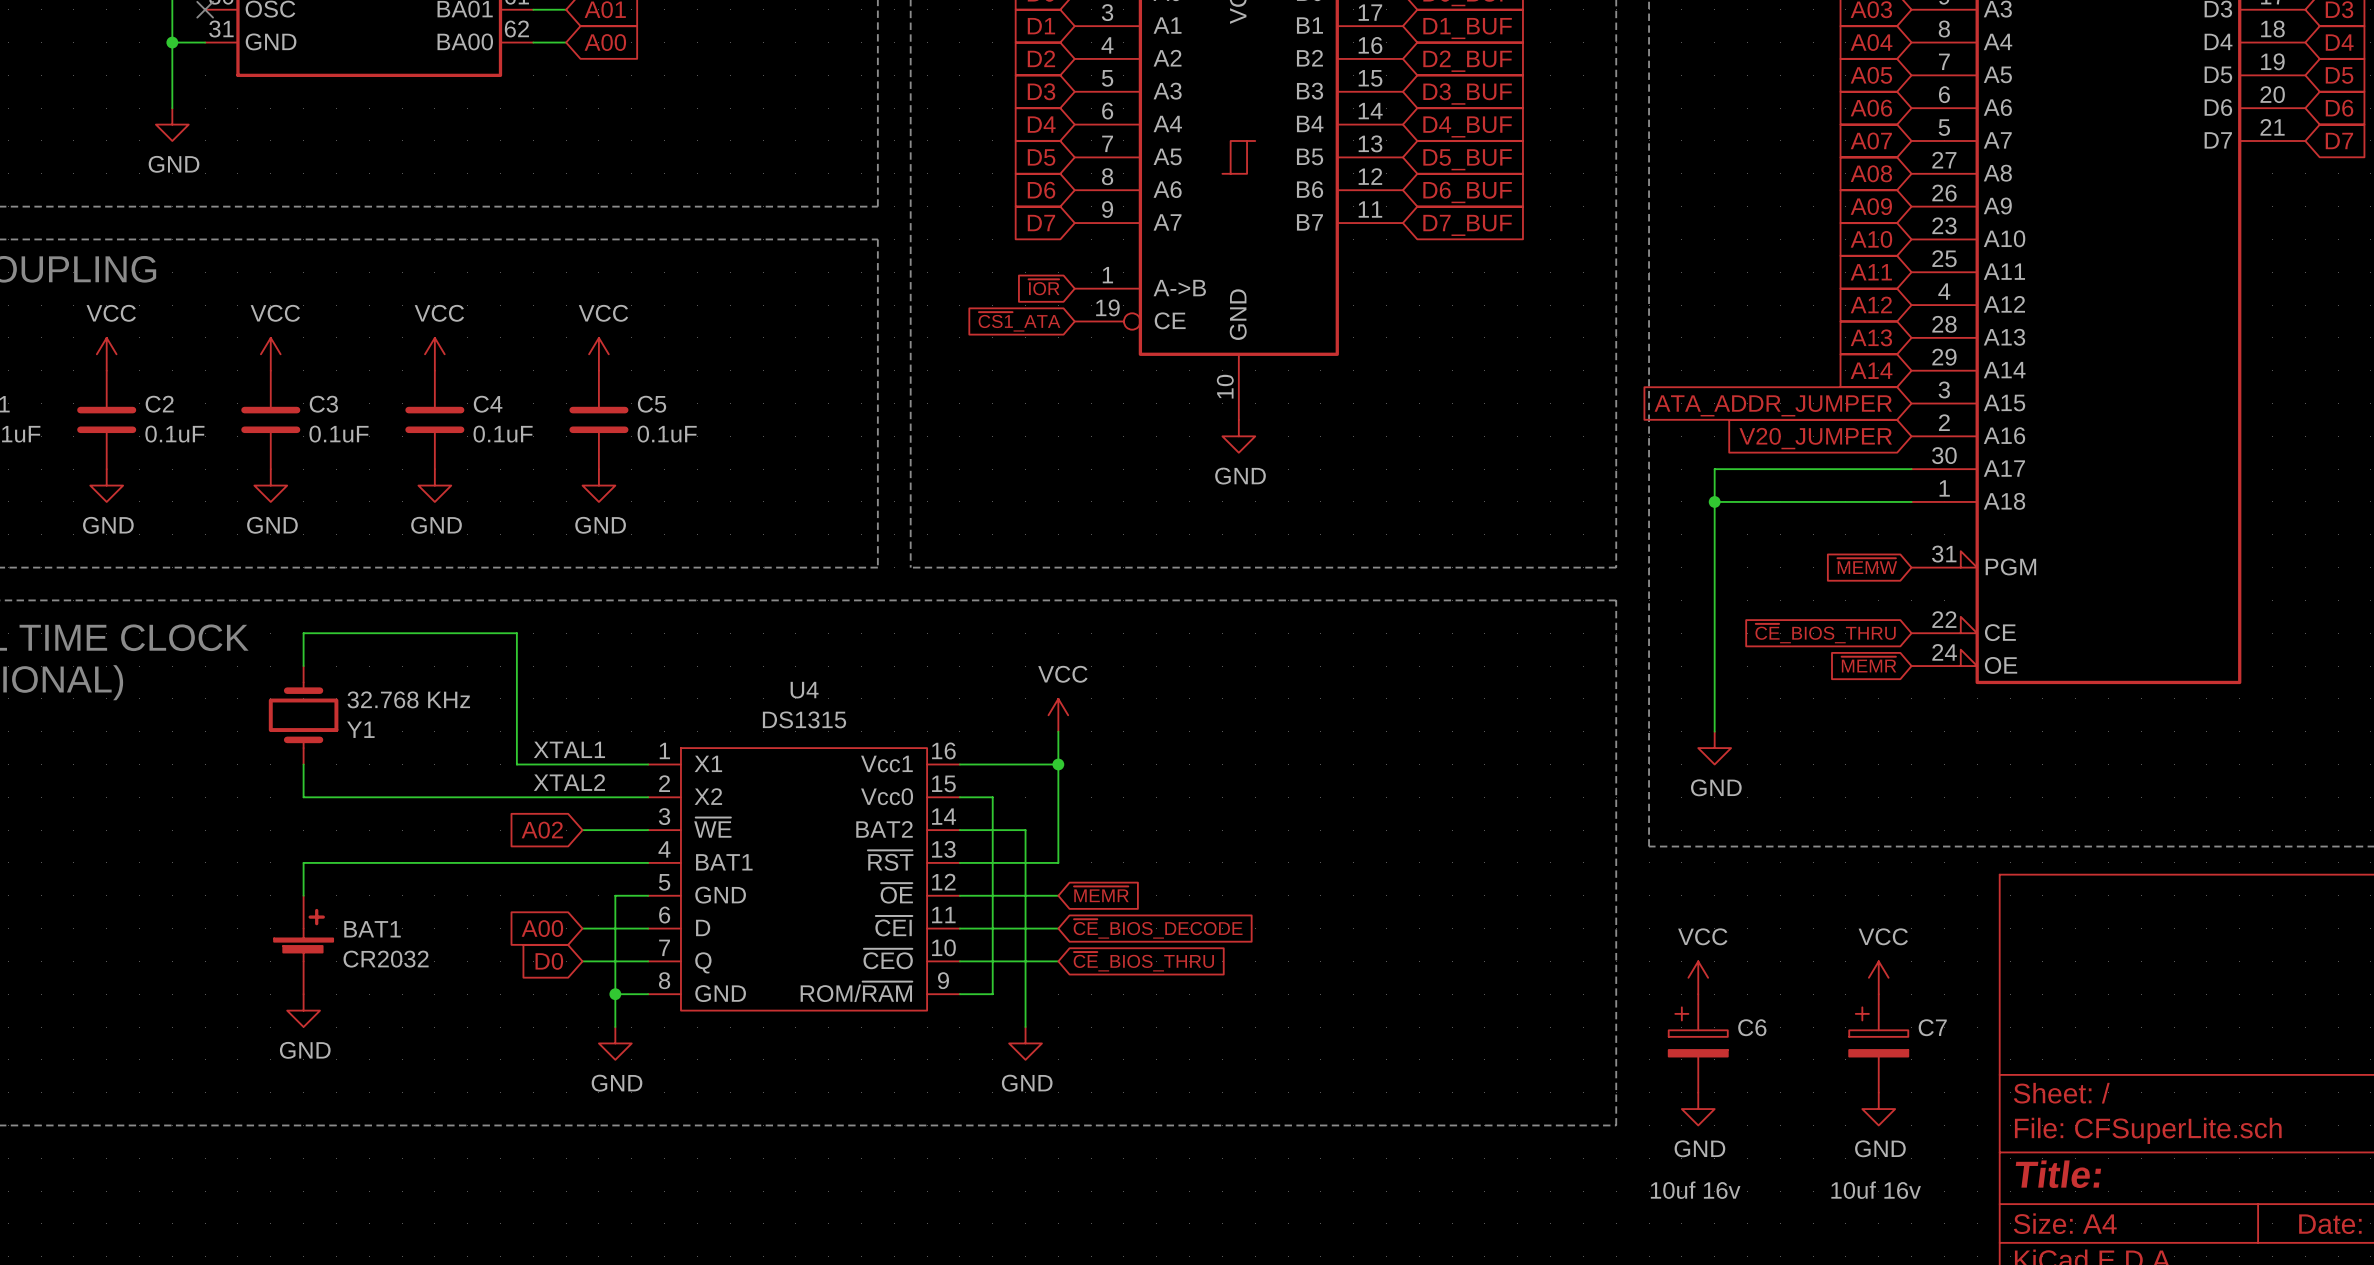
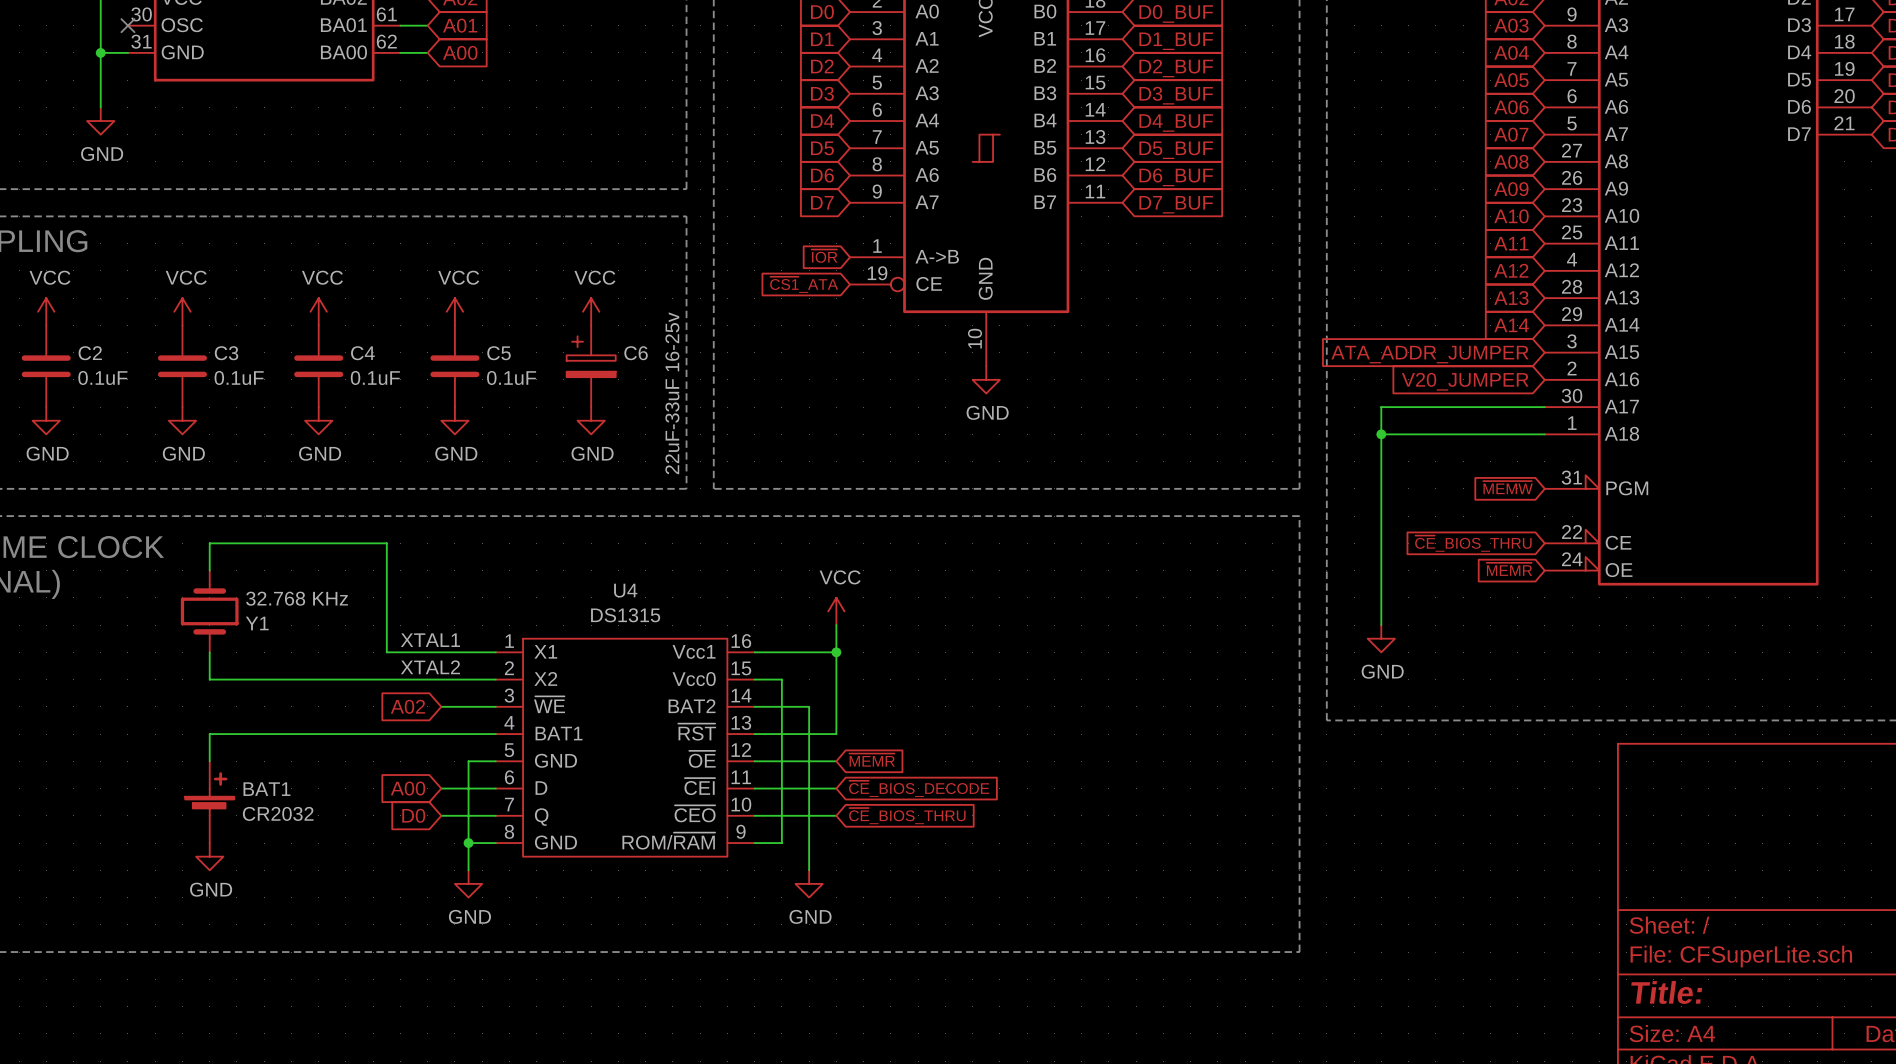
power symbol: none -> VCC (591, 311)
power symbol: none -> GND (591, 420)
power symbol: VCC (1698, 977) -> none
power symbol: VCC (1878, 977) -> none
C6 position: (1698, 1043) -> (591, 366)
C7: 10uf 16v (1878, 1043) -> none
power symbol: GND (1698, 1109) -> none
power symbol: GND (1878, 1109) -> none
C6 value: 10uf 16v (1695, 1190) -> 22uF-33uF 16-25v (672, 393)

